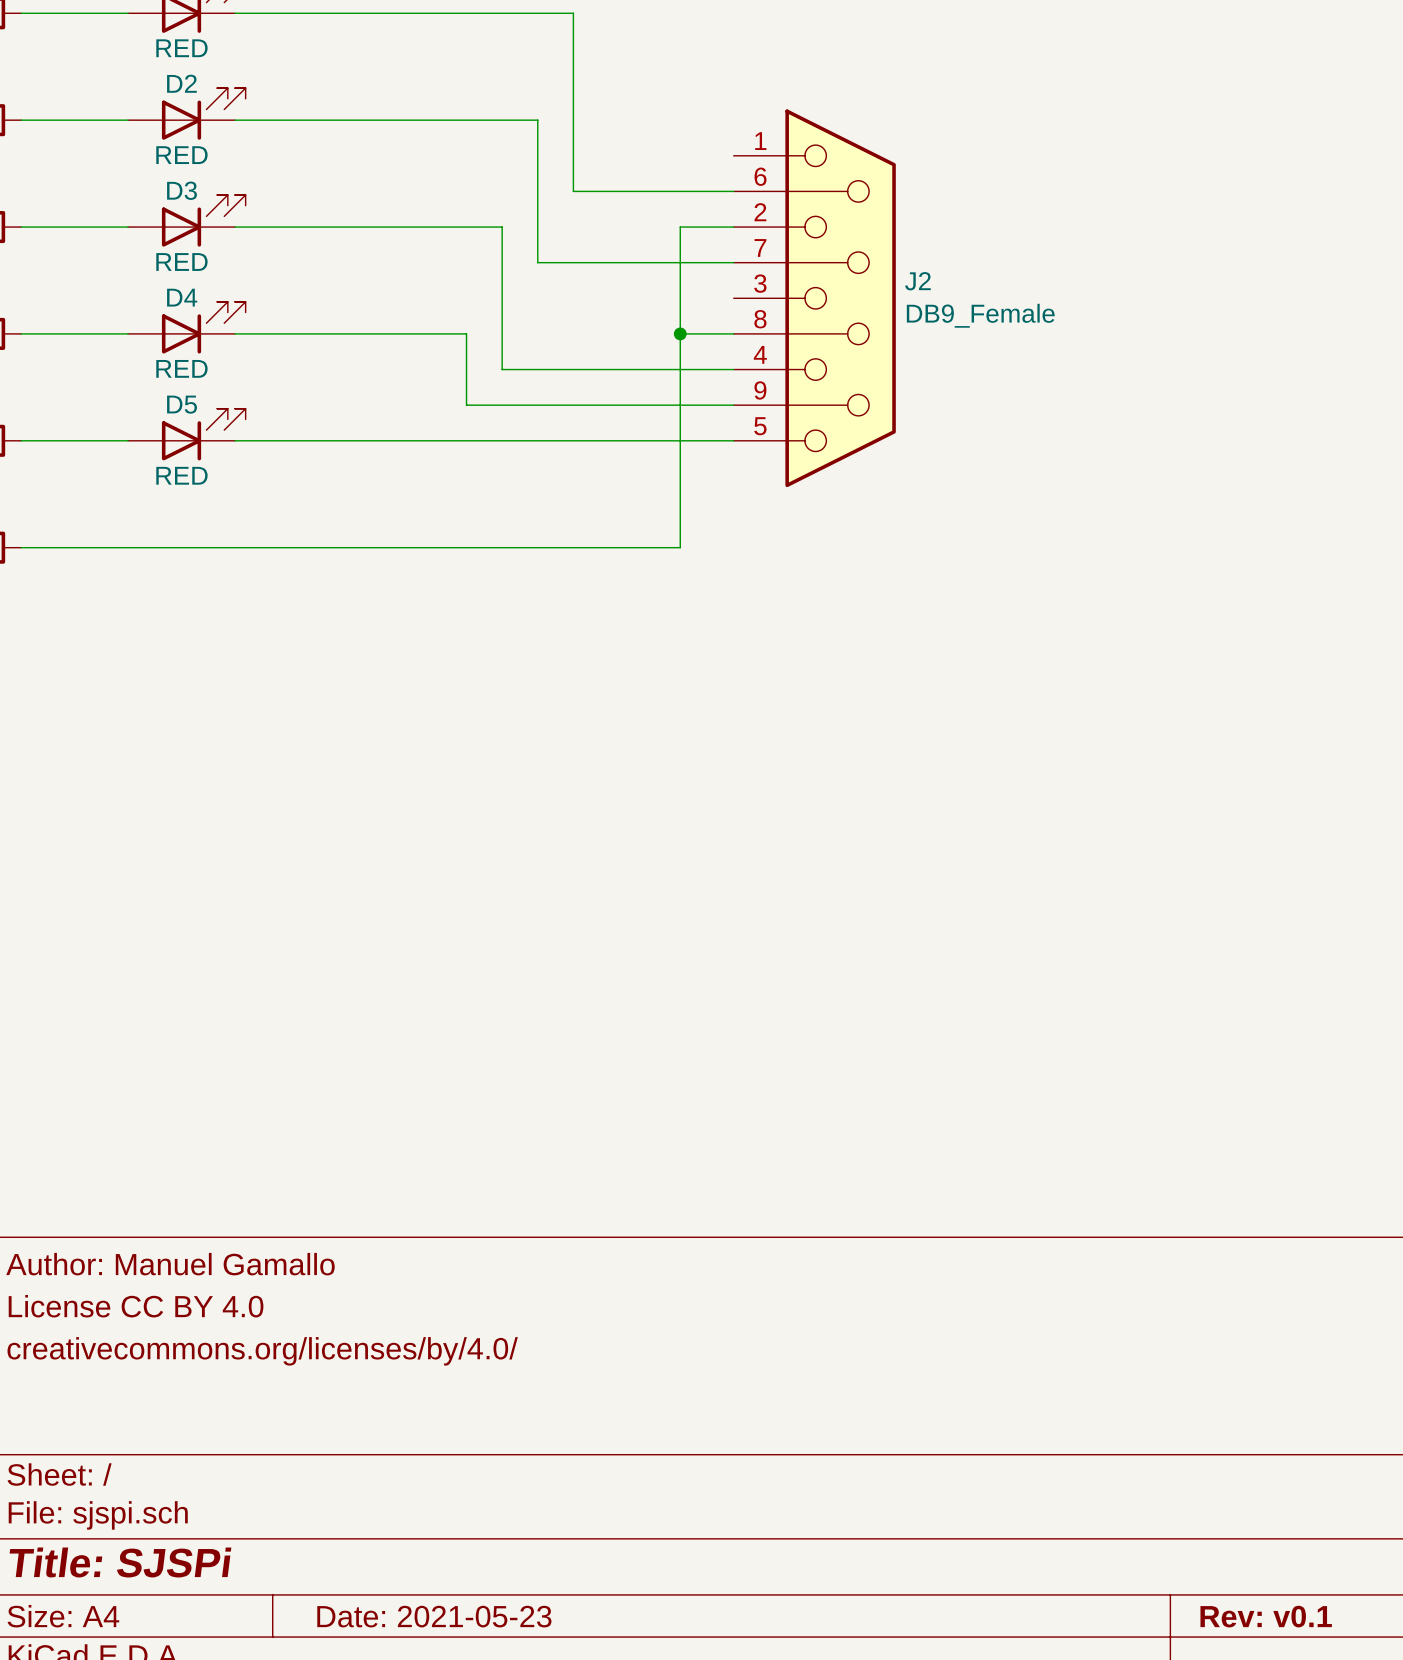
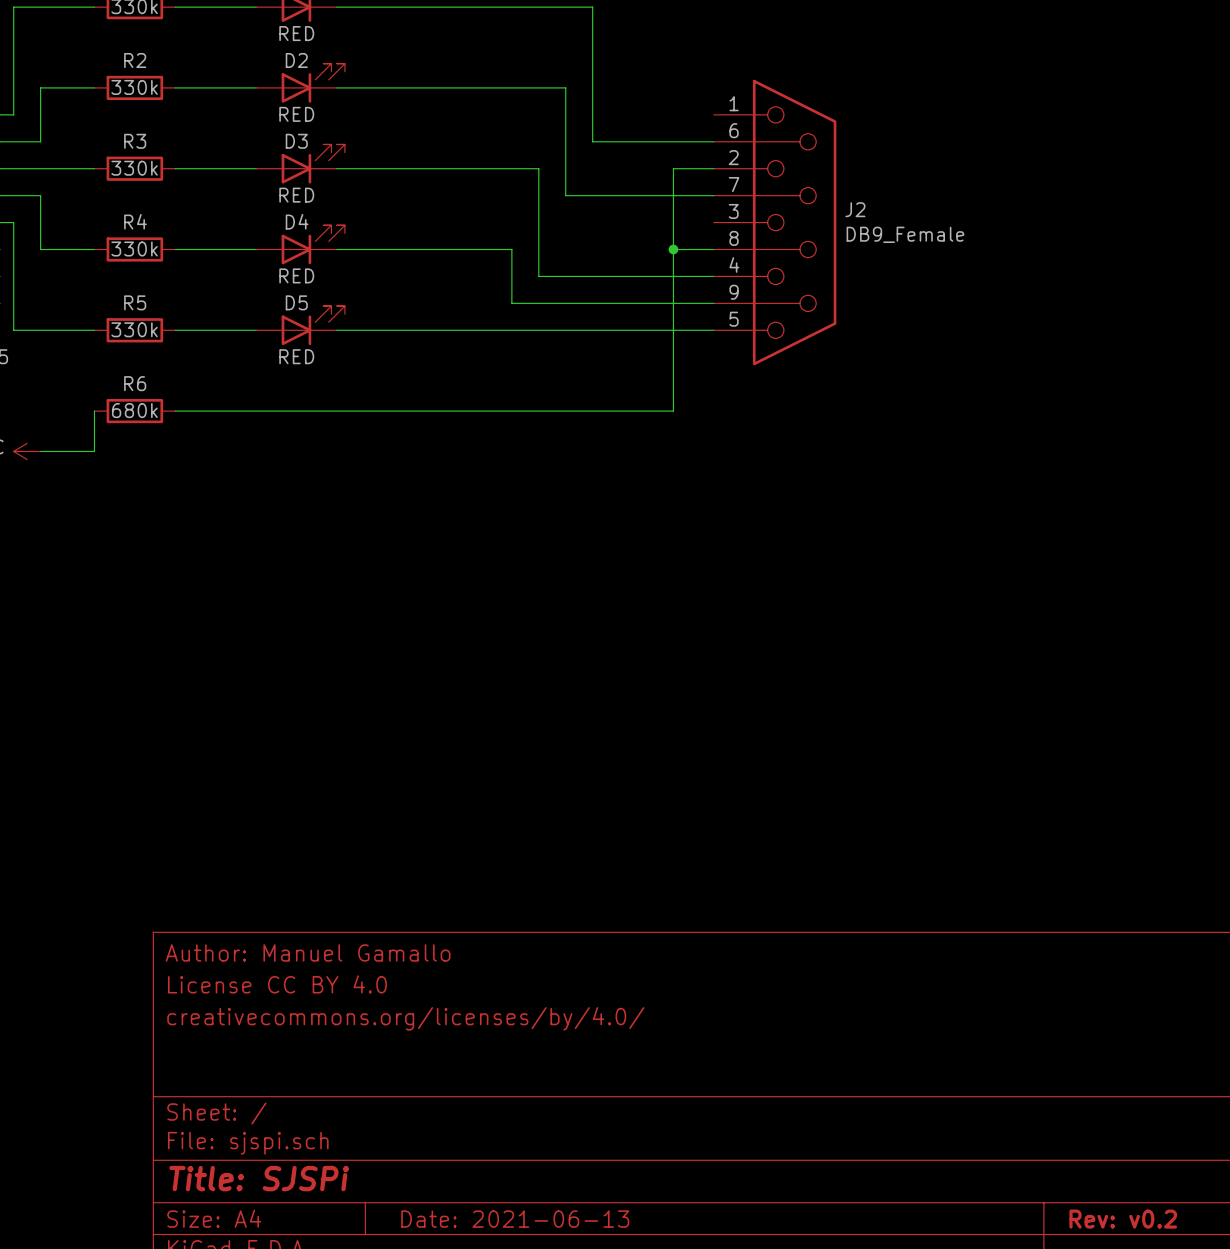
title block: Date: 2021-05-23 (434, 1616) -> Date: 2021-06-13 (515, 1219)
title block: Rev: v0.1 (1266, 1616) -> Rev: v0.2 (1123, 1219)

